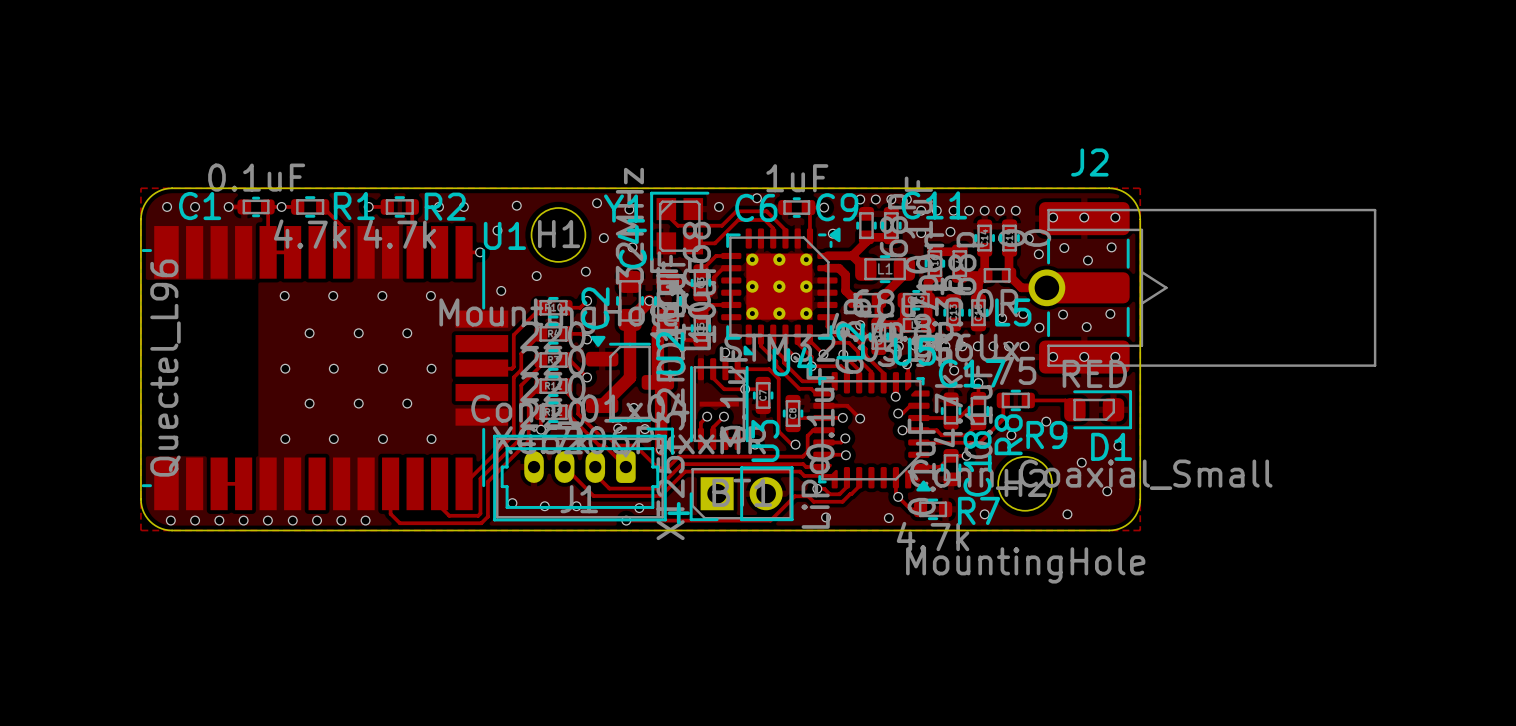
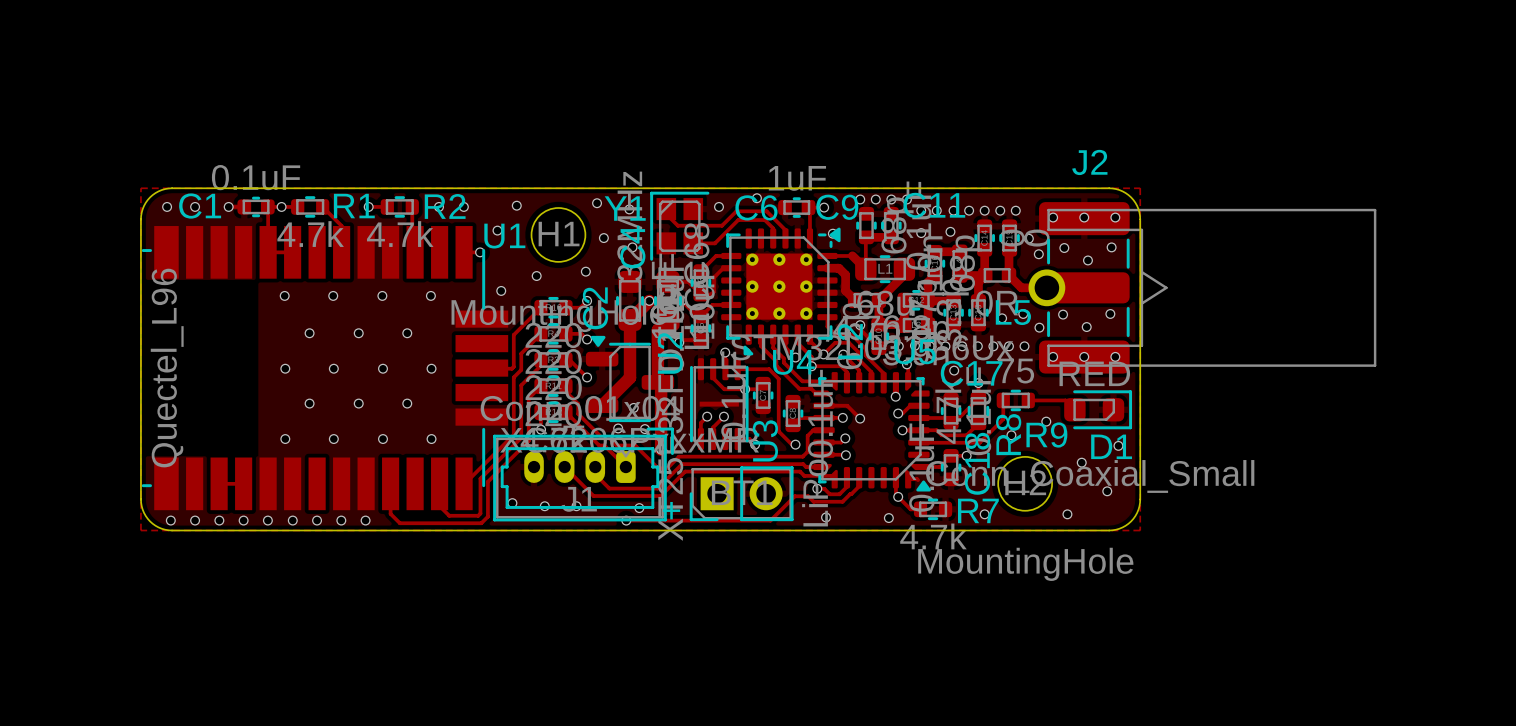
track: (866, 237) (866, 241) (852, 255) (827, 255) -> (852, 255) (827, 255)
track: none -> (866, 237) (865, 269)

